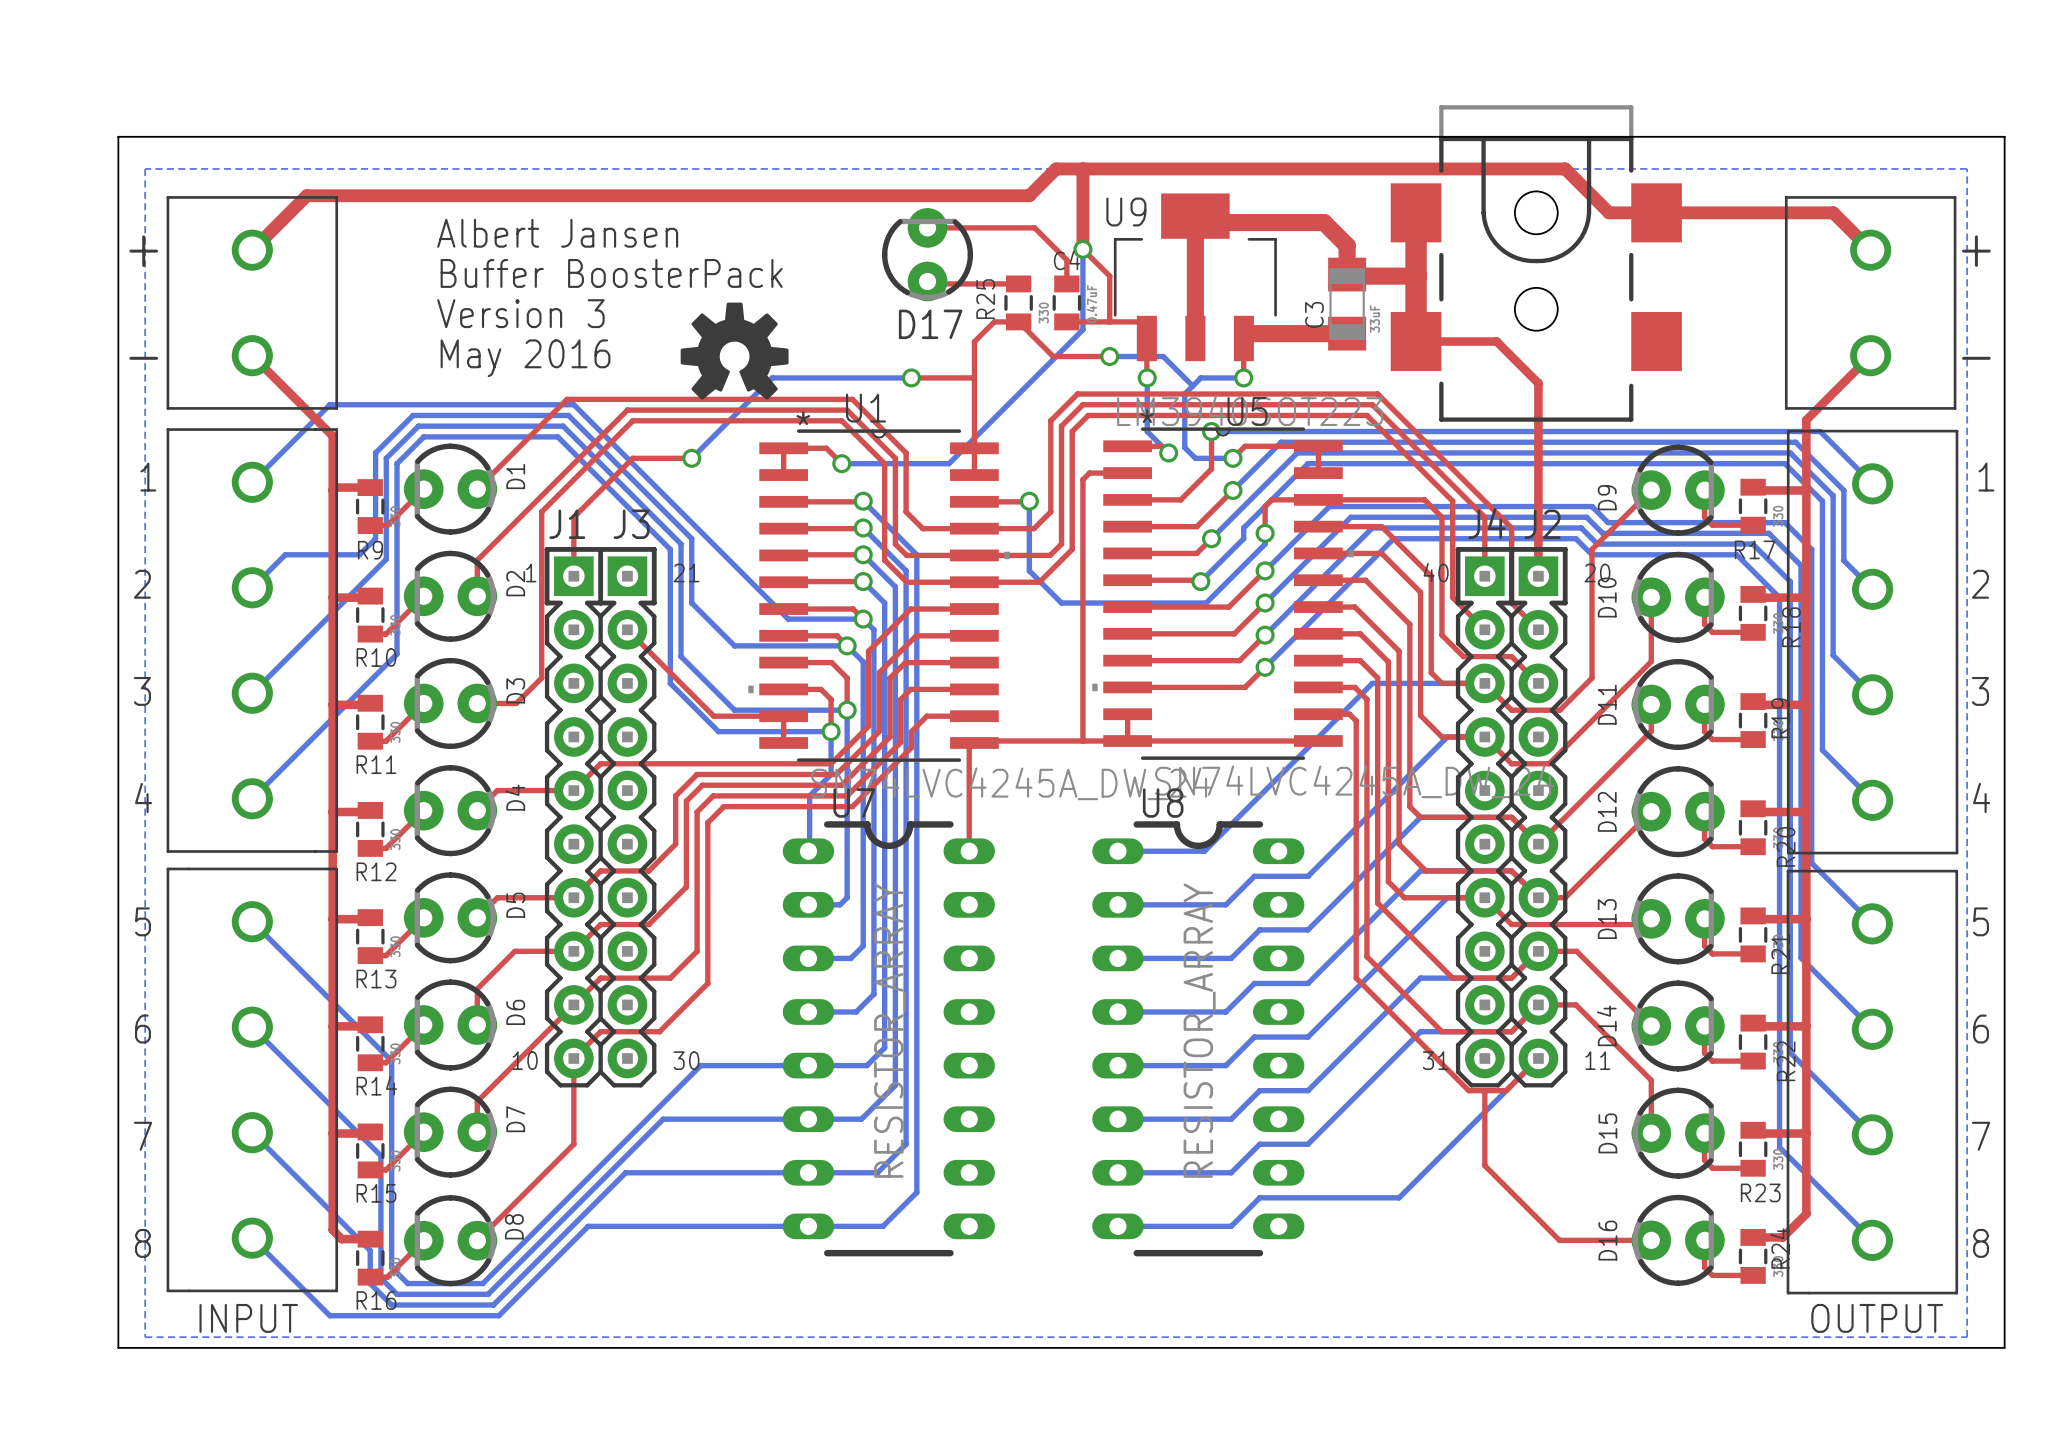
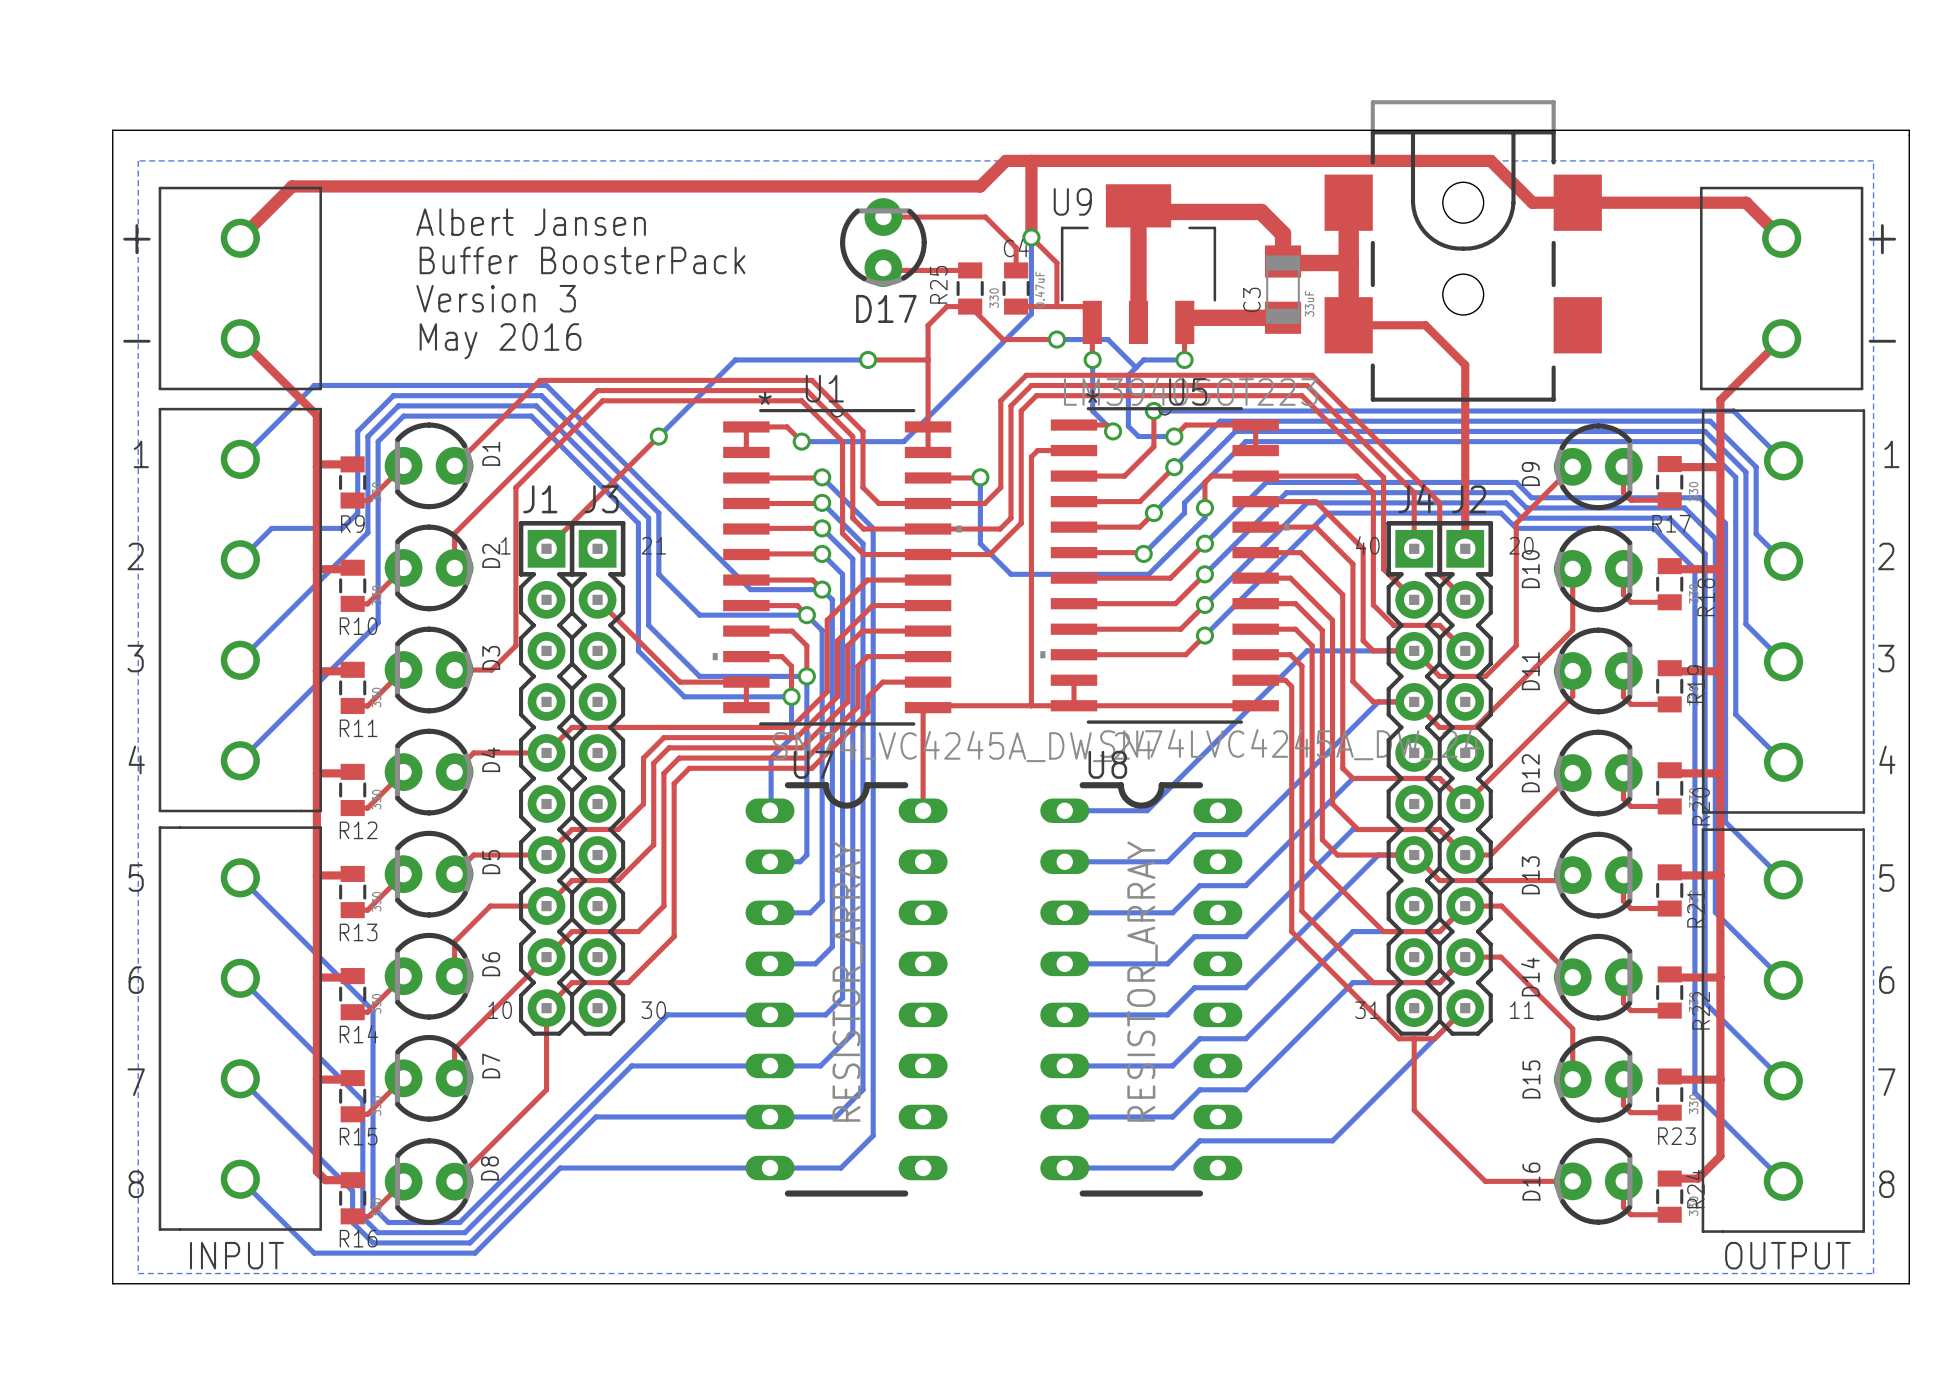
drawing: [680, 302, 789, 400] -> none
top track: (691, 458) (632, 458) (573, 517) (573, 576) -> (658, 436) (546, 548)

